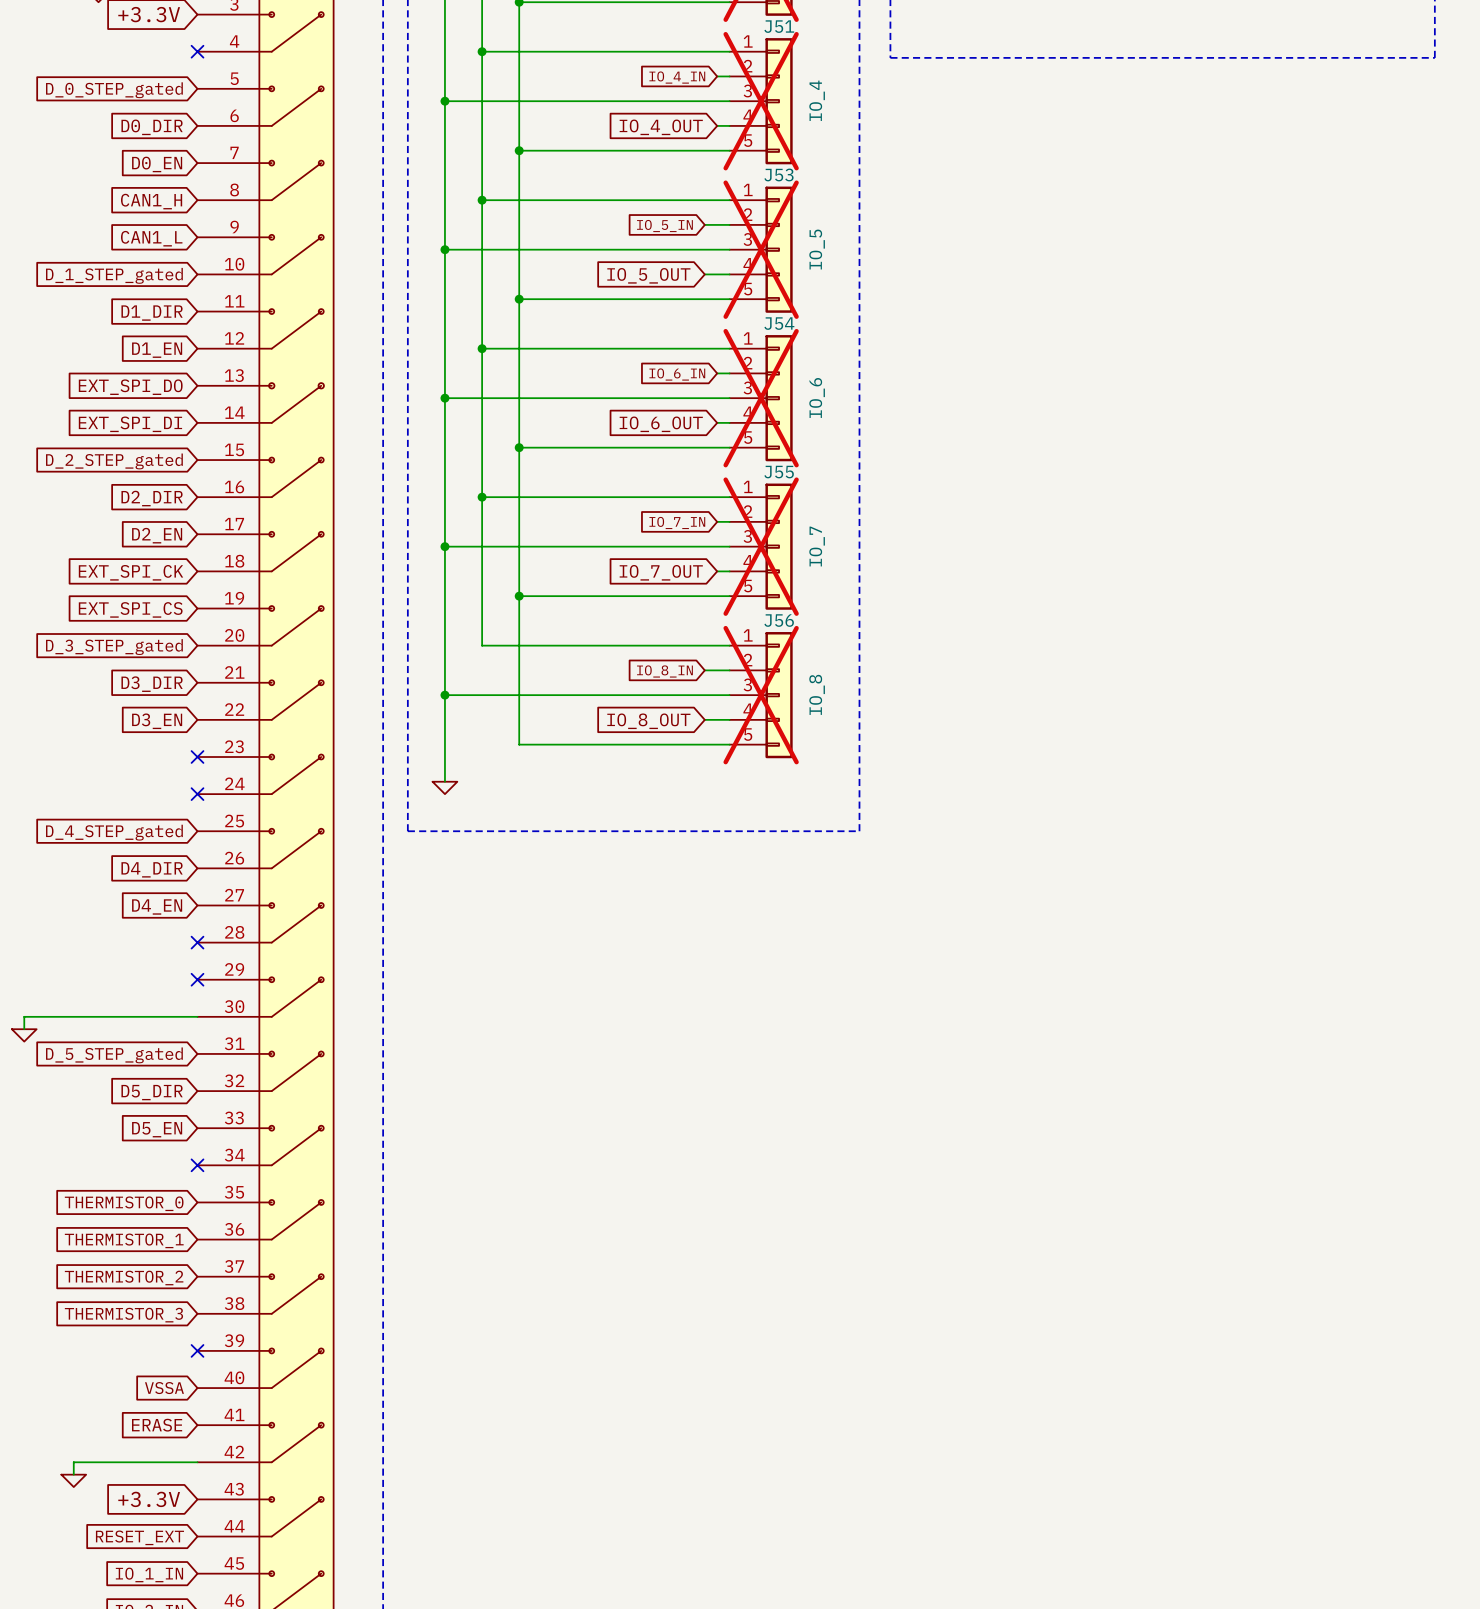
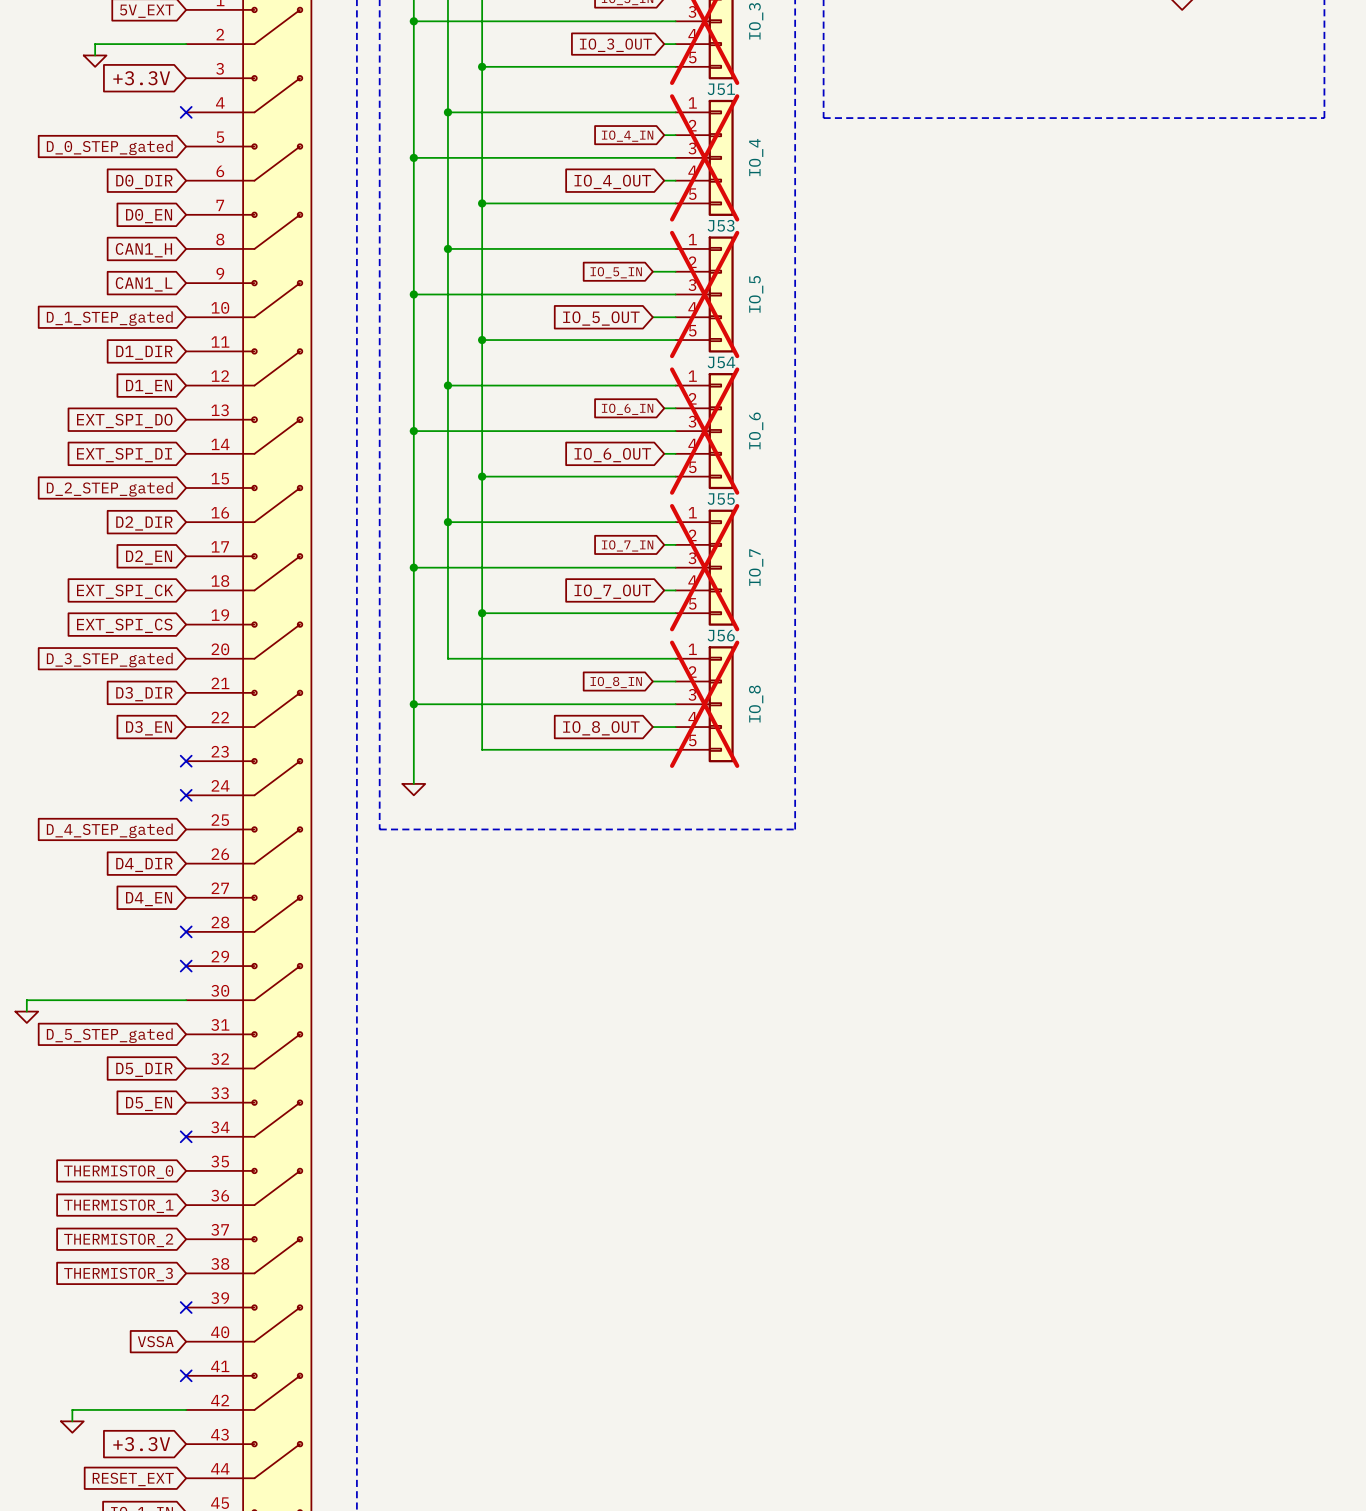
global label: ERASE (157, 1425) -> none
no-connect mark: none -> (186, 1375)

